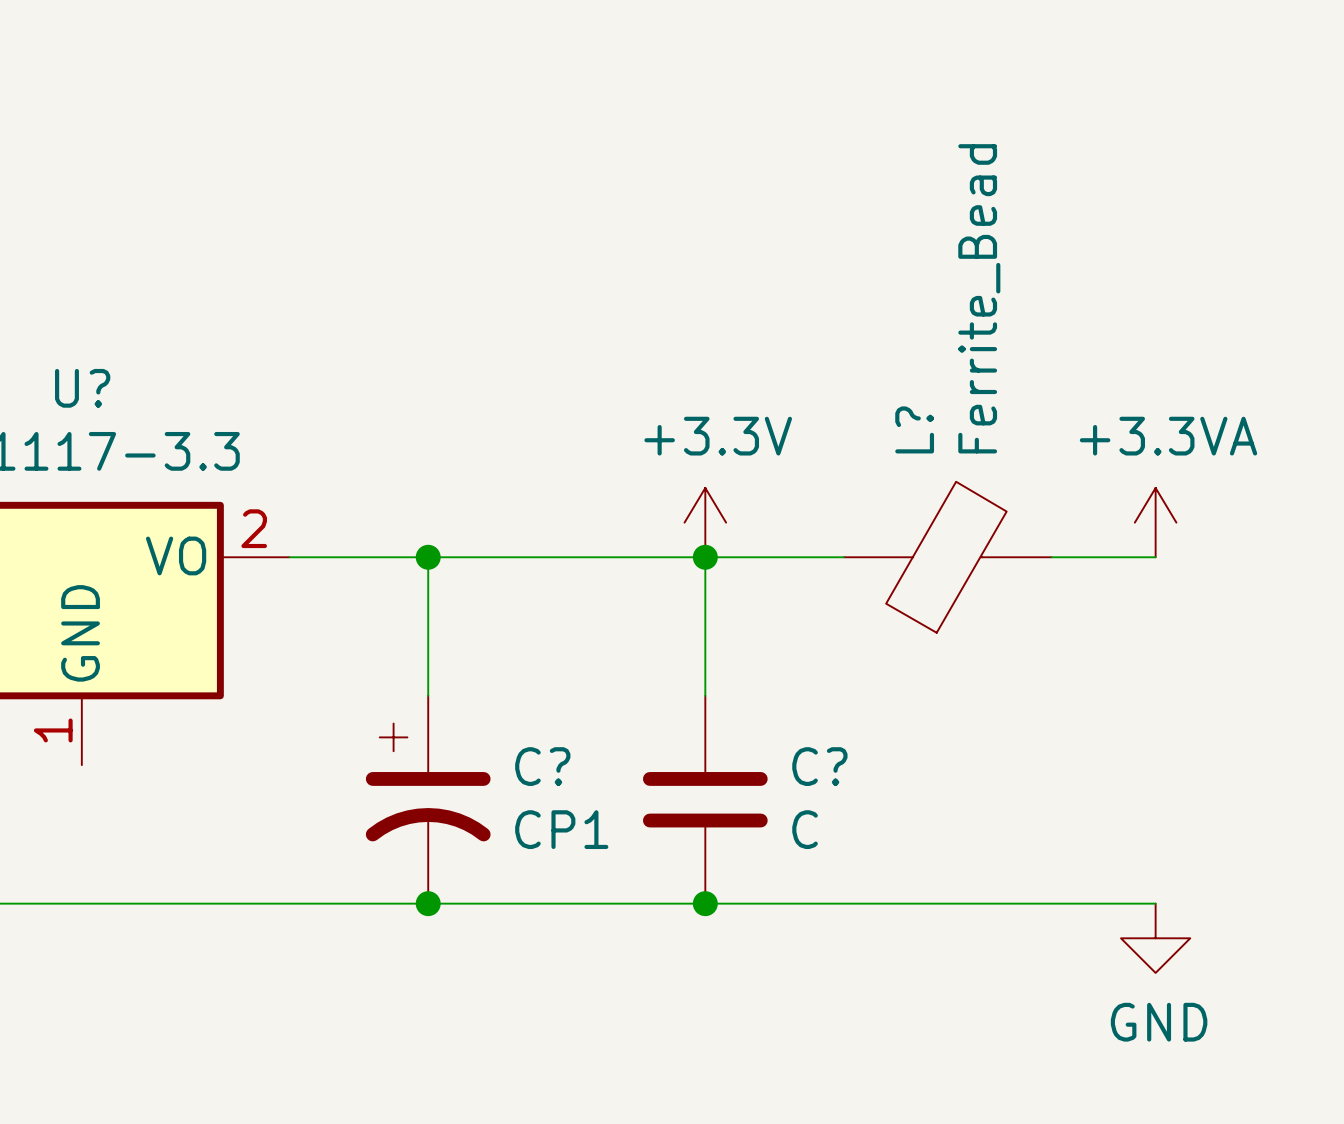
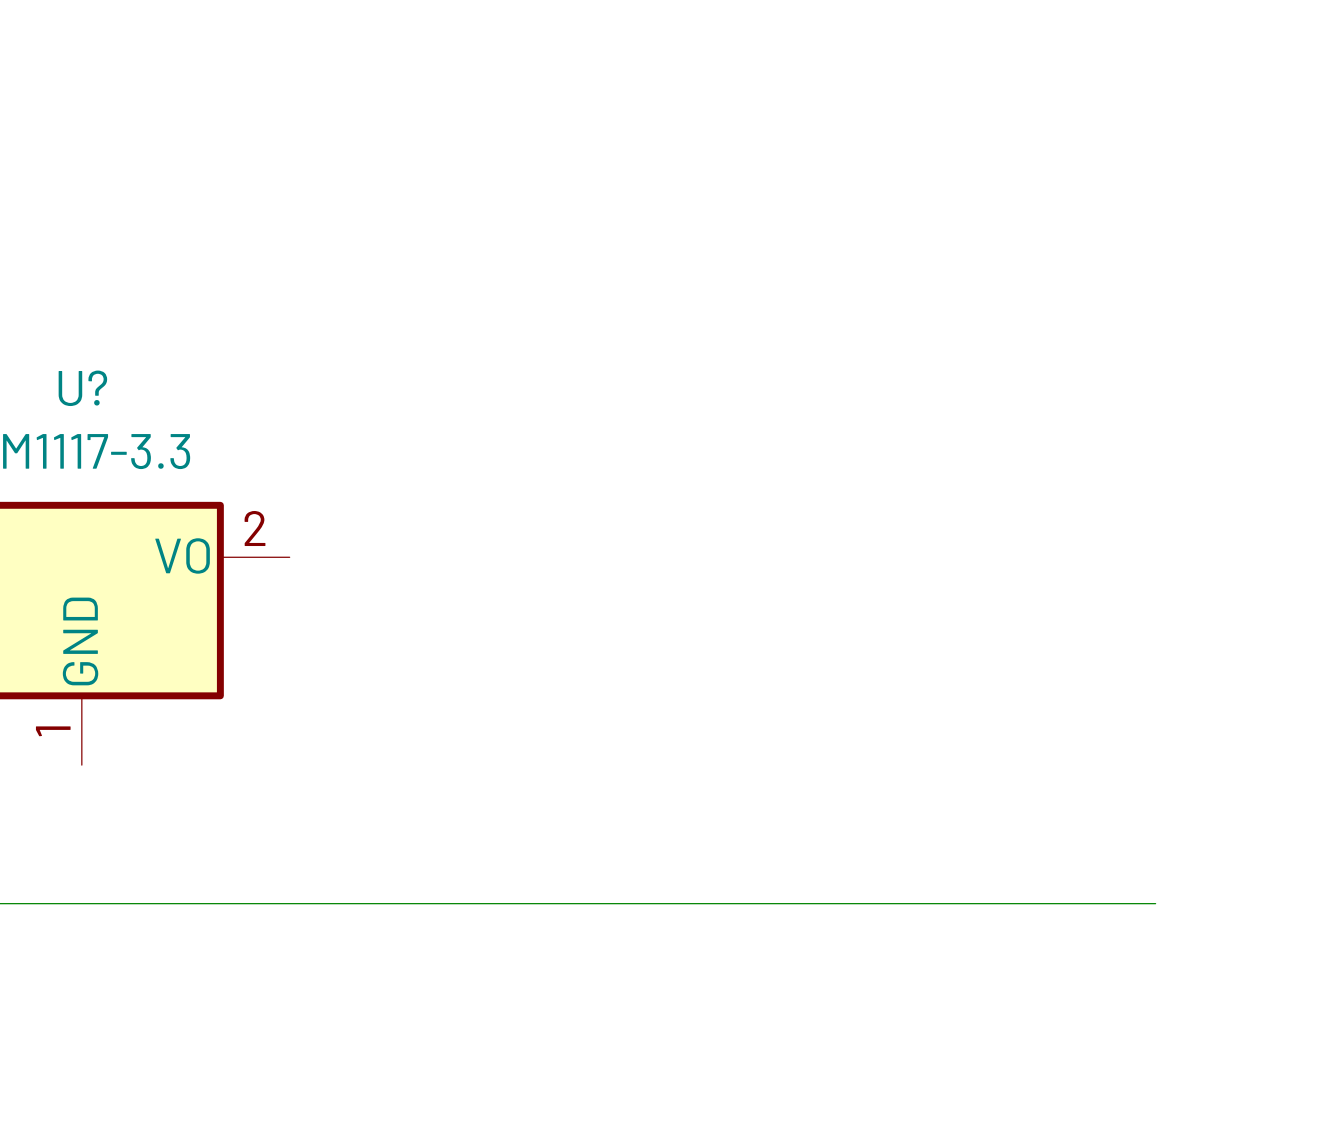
power symbol: +3.3V (705, 522) -> none
power symbol: +3.3VA (1155, 522) -> none
wire: (289, 557) (843, 557) -> none
wire: (428, 557) (428, 695) -> none
junction: (428, 557) -> none
wire: (705, 557) (705, 695) -> none
junction: (705, 557) -> none
L?: Ferrite_Bead (947, 557) -> none
wire: (1051, 557) (1155, 557) -> none
C?: CP1 (428, 799) -> none
C?: C (705, 799) -> none
junction: (428, 903) -> none
junction: (705, 903) -> none
power symbol: GND (1155, 938) -> none

